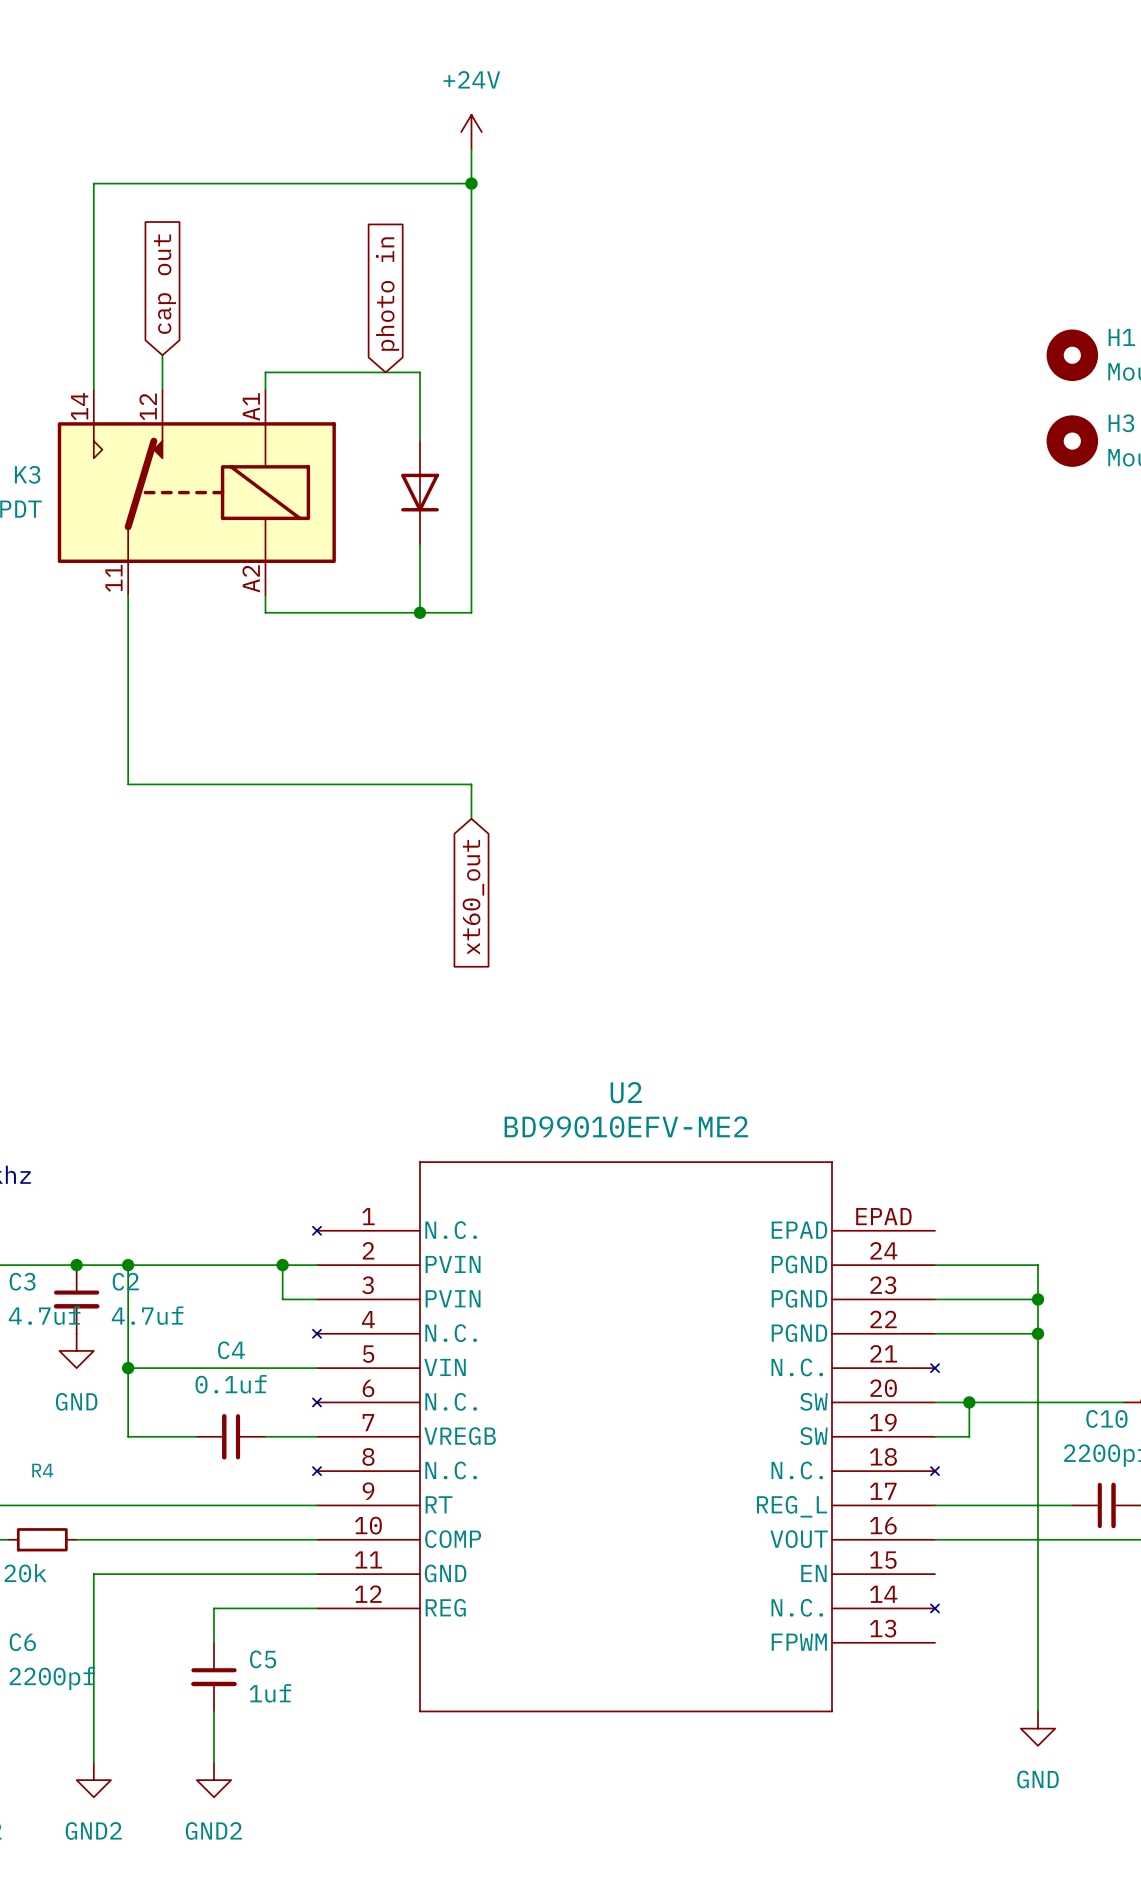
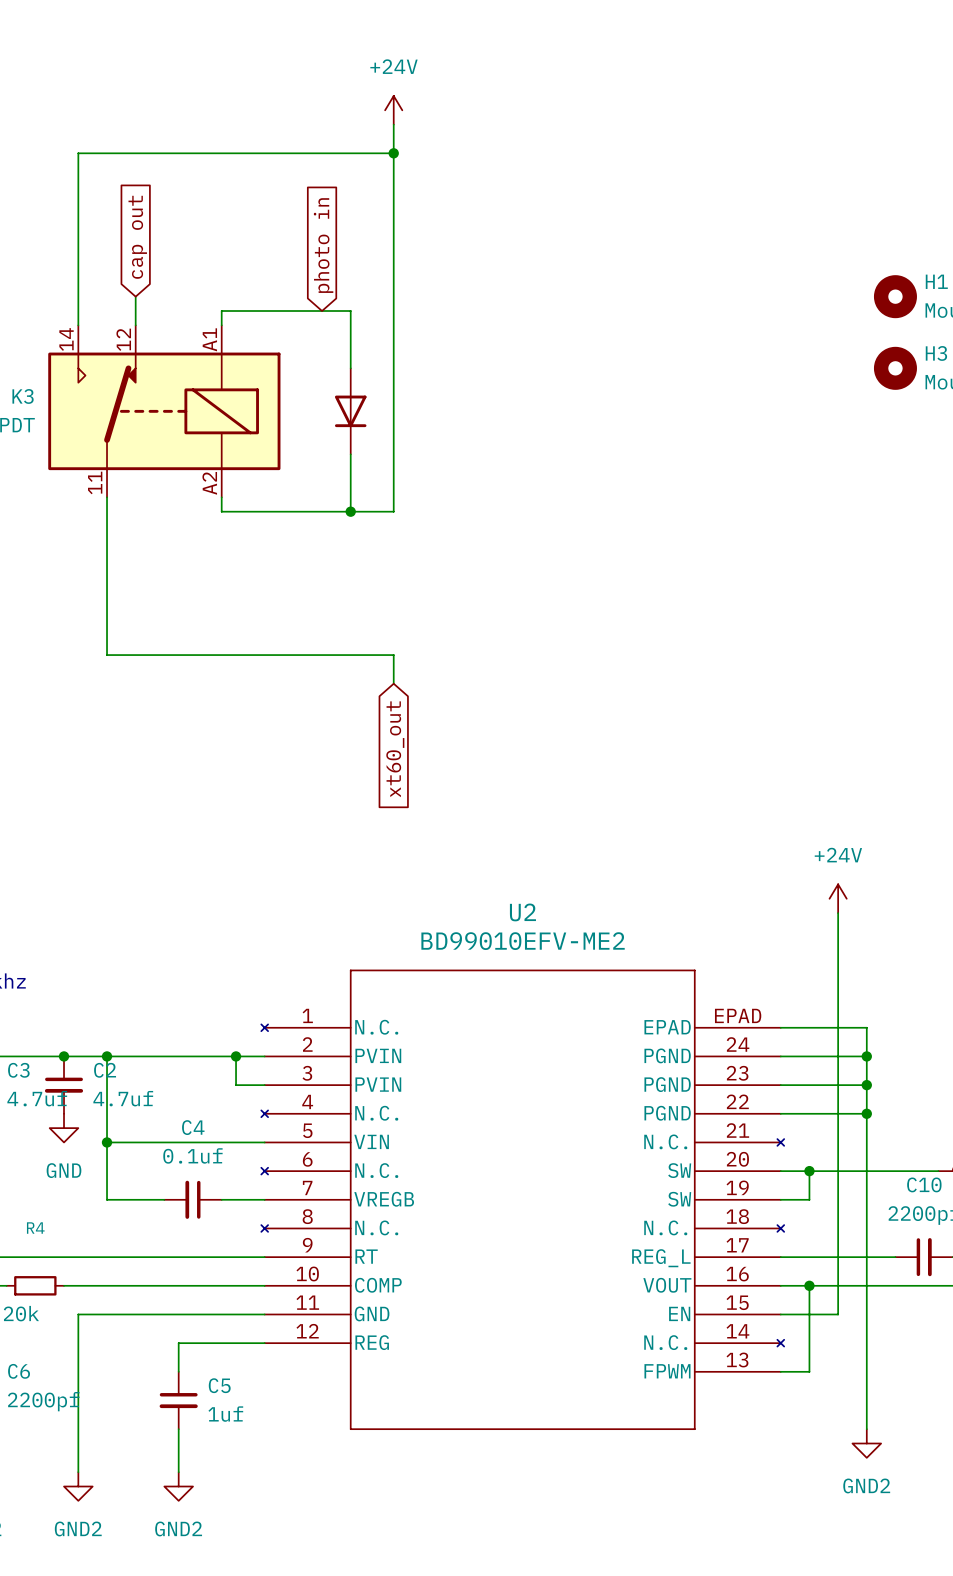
power symbol: none -> +24V (838, 898)
wire: none -> (838, 913) (838, 1314) (780, 1314)
wire: none -> (780, 1027) (866, 1027) (866, 1056)
junction: none -> (866, 1056)
wire: none -> (809, 1285) (809, 1371) (780, 1371)
junction: none -> (809, 1285)
power symbol: GND (1037, 1728) -> GND2 (866, 1443)

